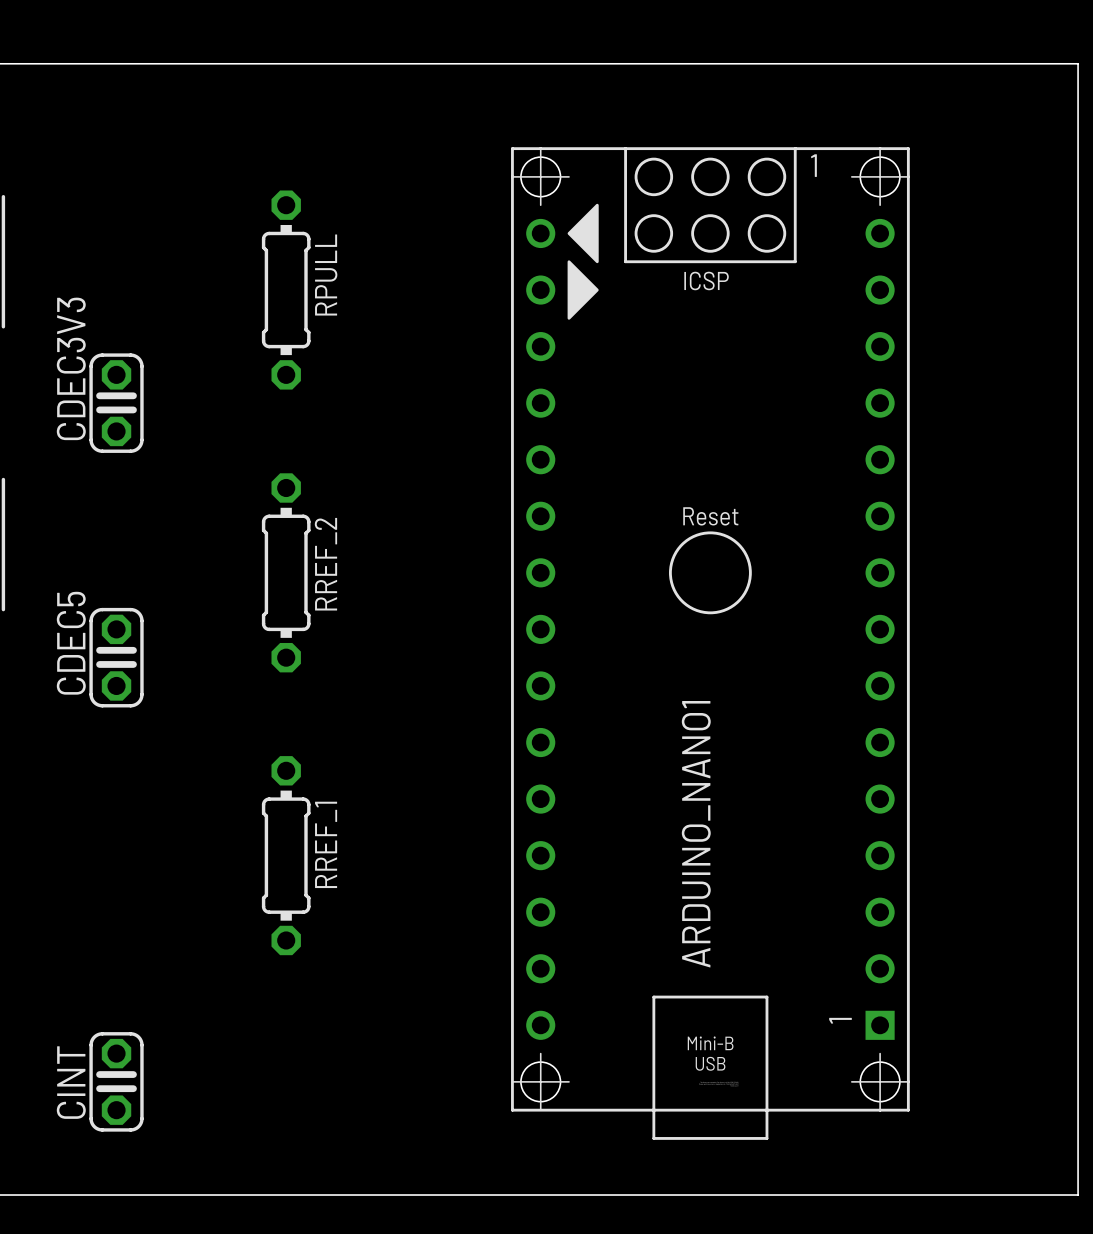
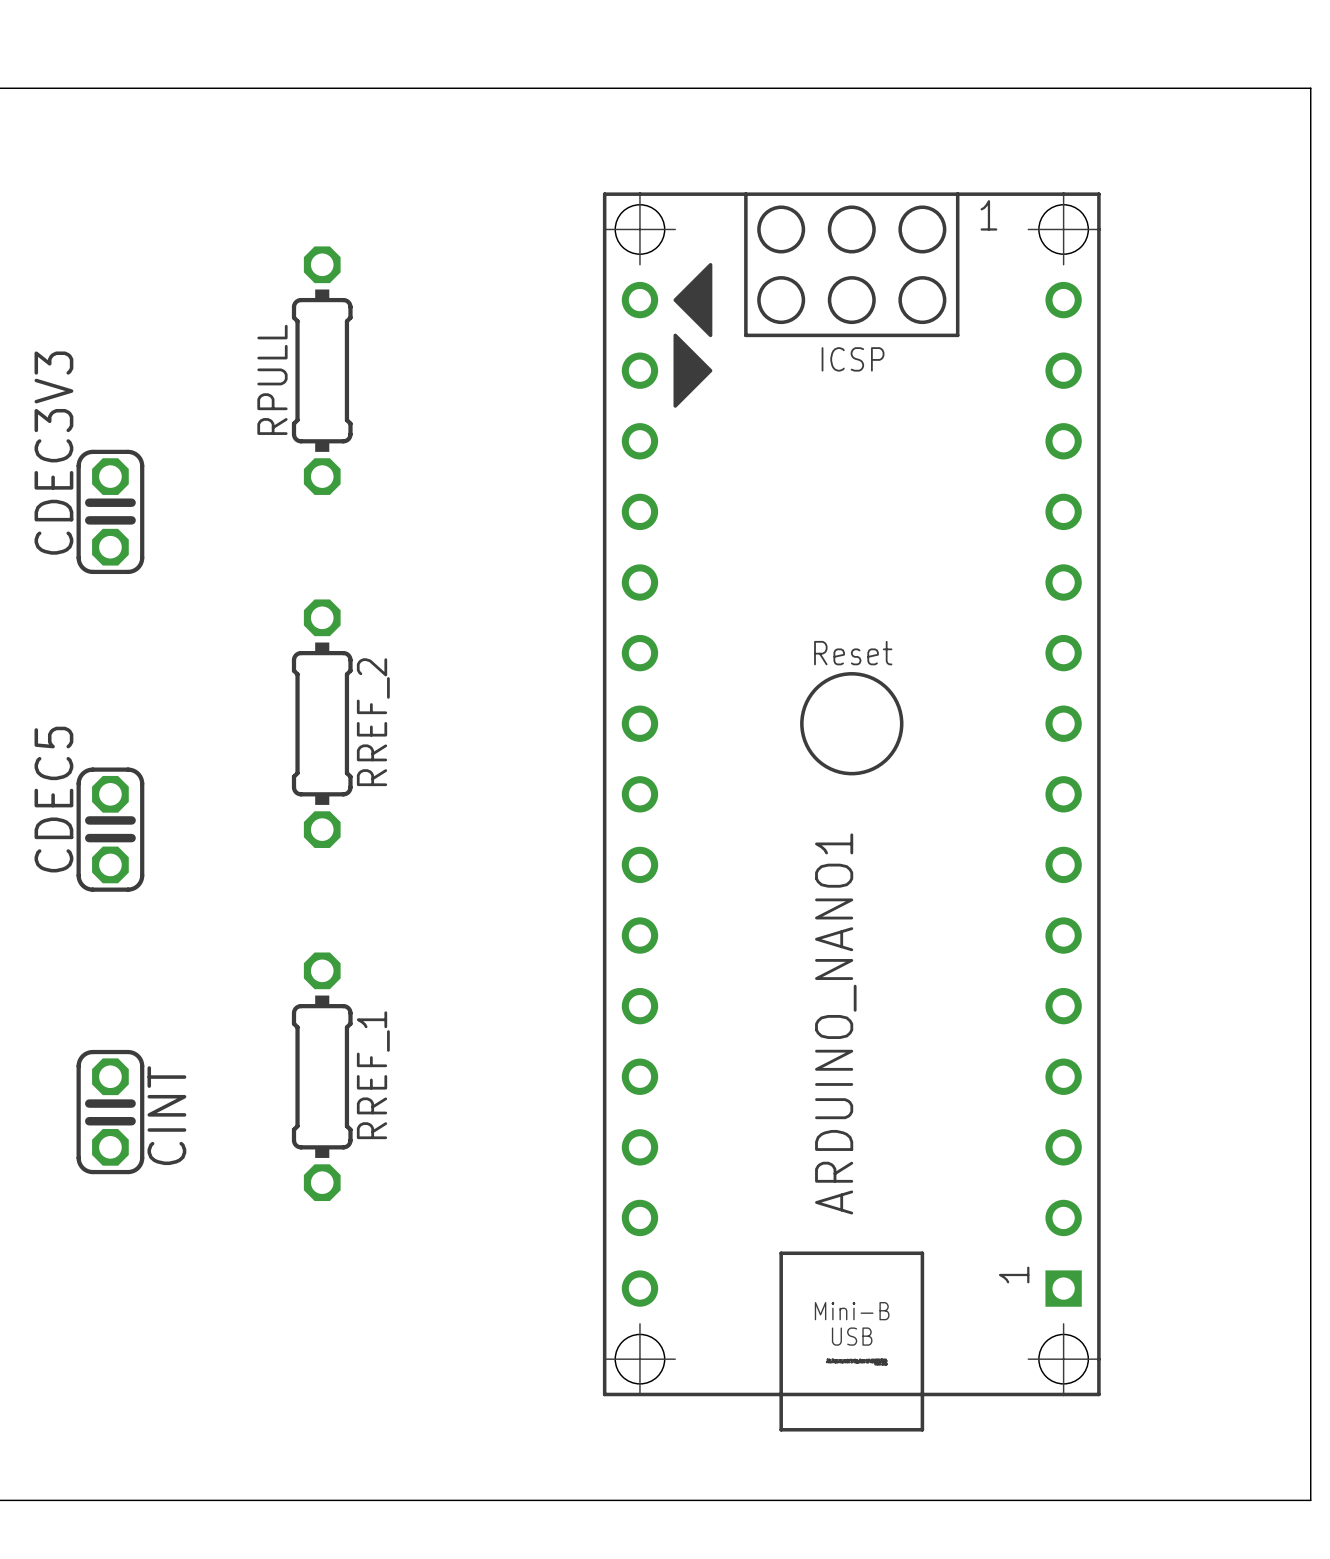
RPULL name position: RPULL (326, 275) -> RPULL (272, 379)
CINT rotation: 0° (116, 1081) -> 180° (110, 1112)
CINT position: (116, 1081) -> (110, 1112)

